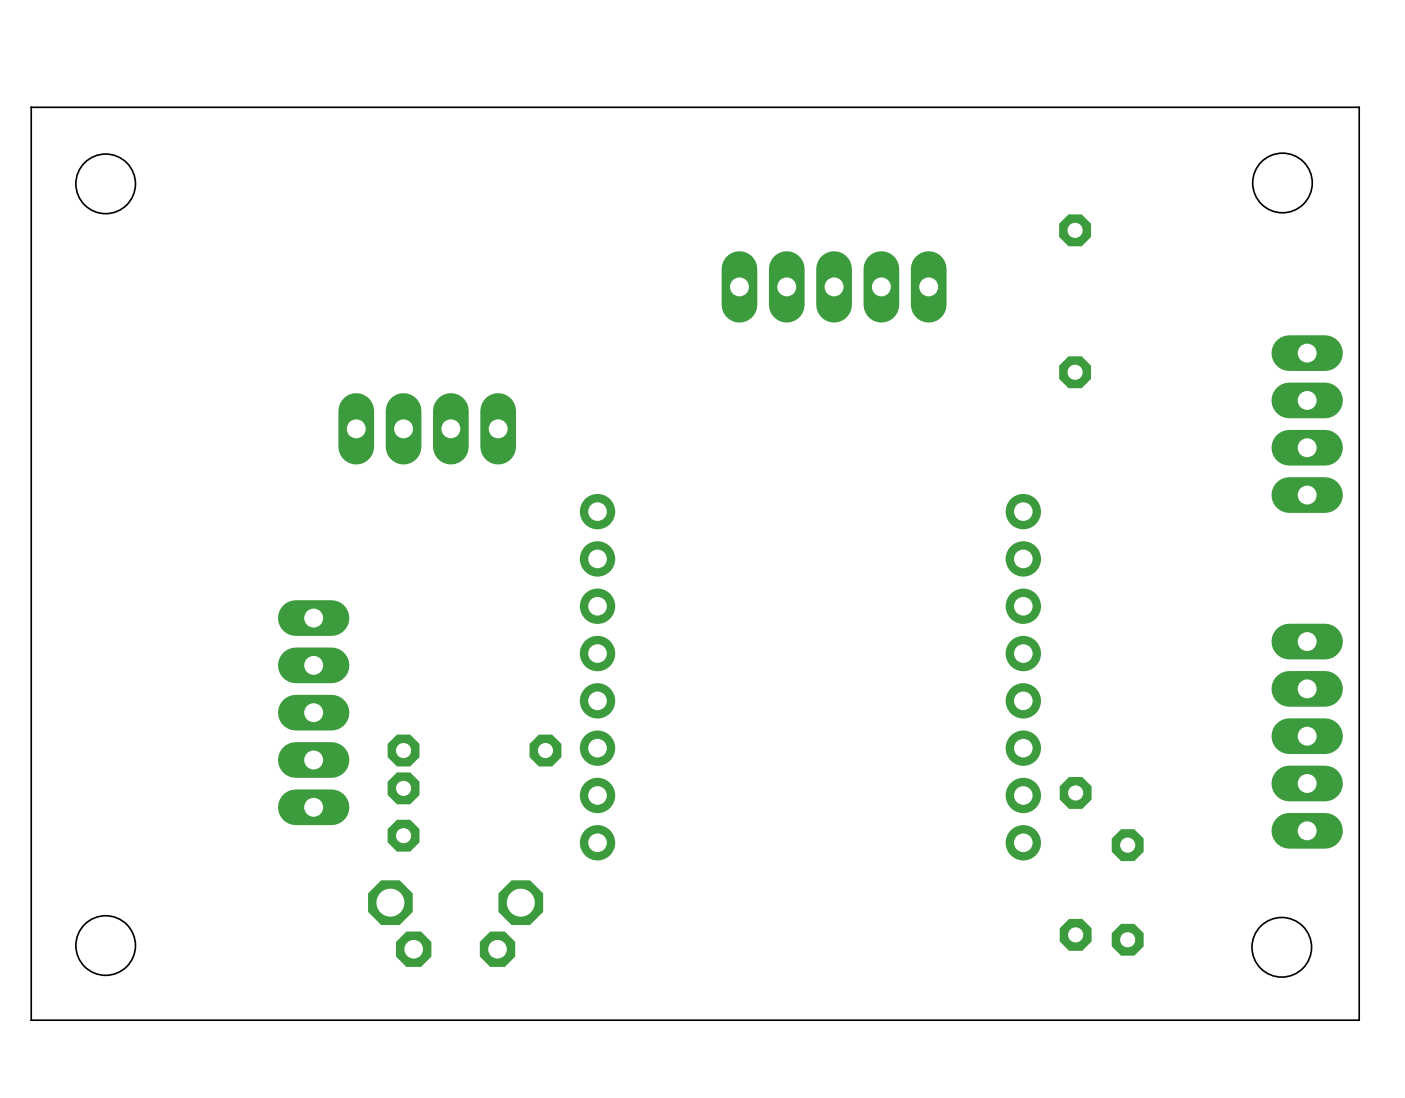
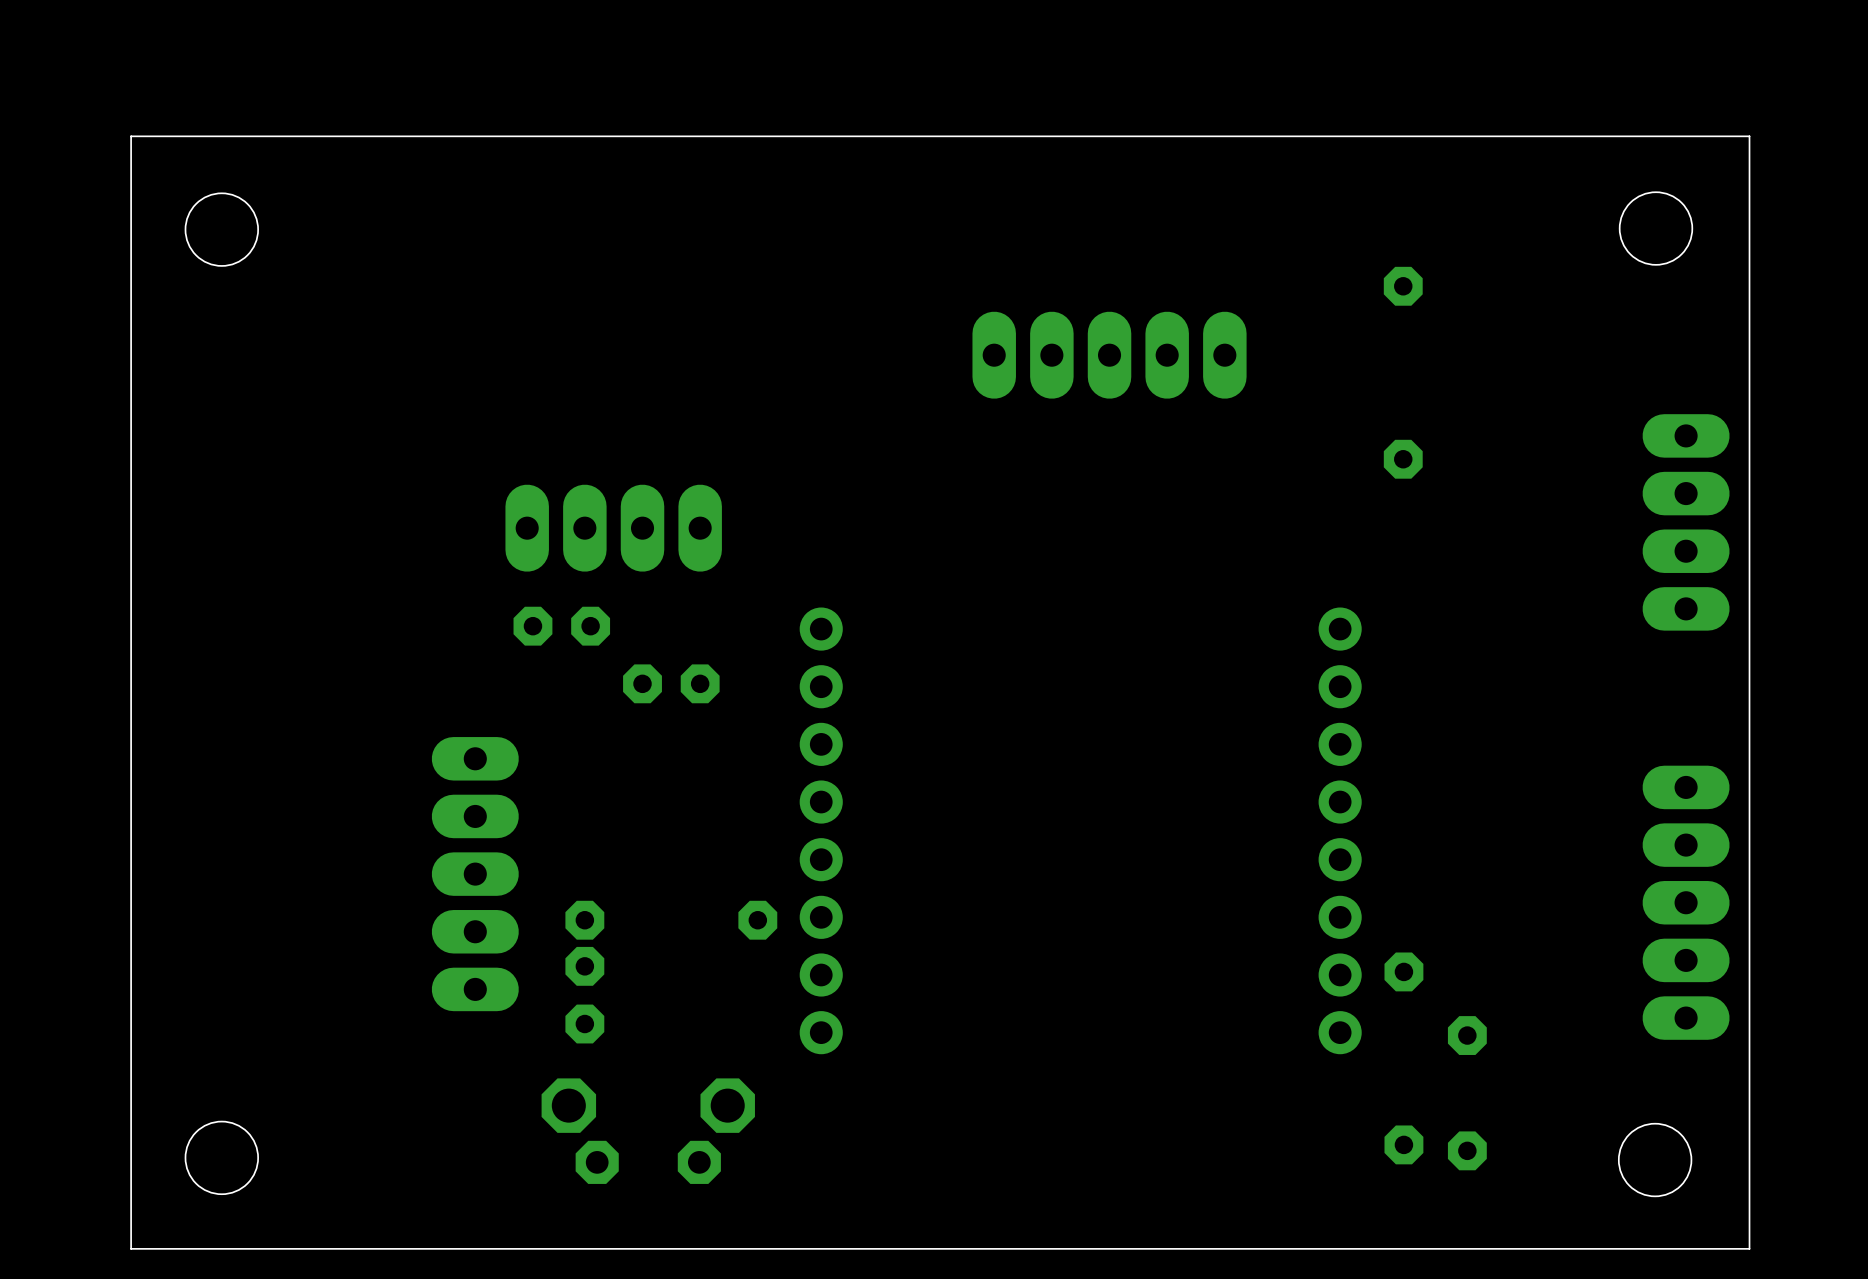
part: none -> (561, 626)
part: none -> (671, 683)

